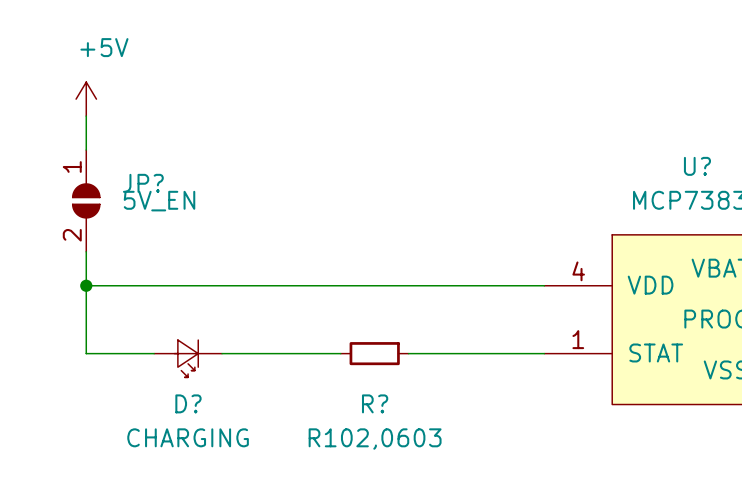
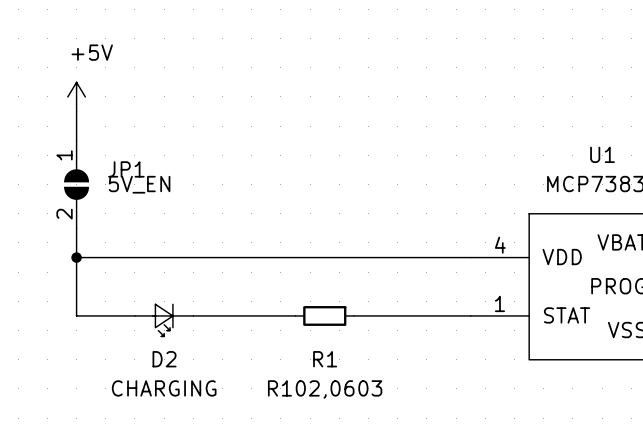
U? name: U? (697, 166) -> U1 (602, 154)
JP? name: JP? (143, 183) -> JP1 (126, 169)
D? name: D? (188, 403) -> D2 (164, 359)
R? name: R? (375, 403) -> R1 (325, 359)

